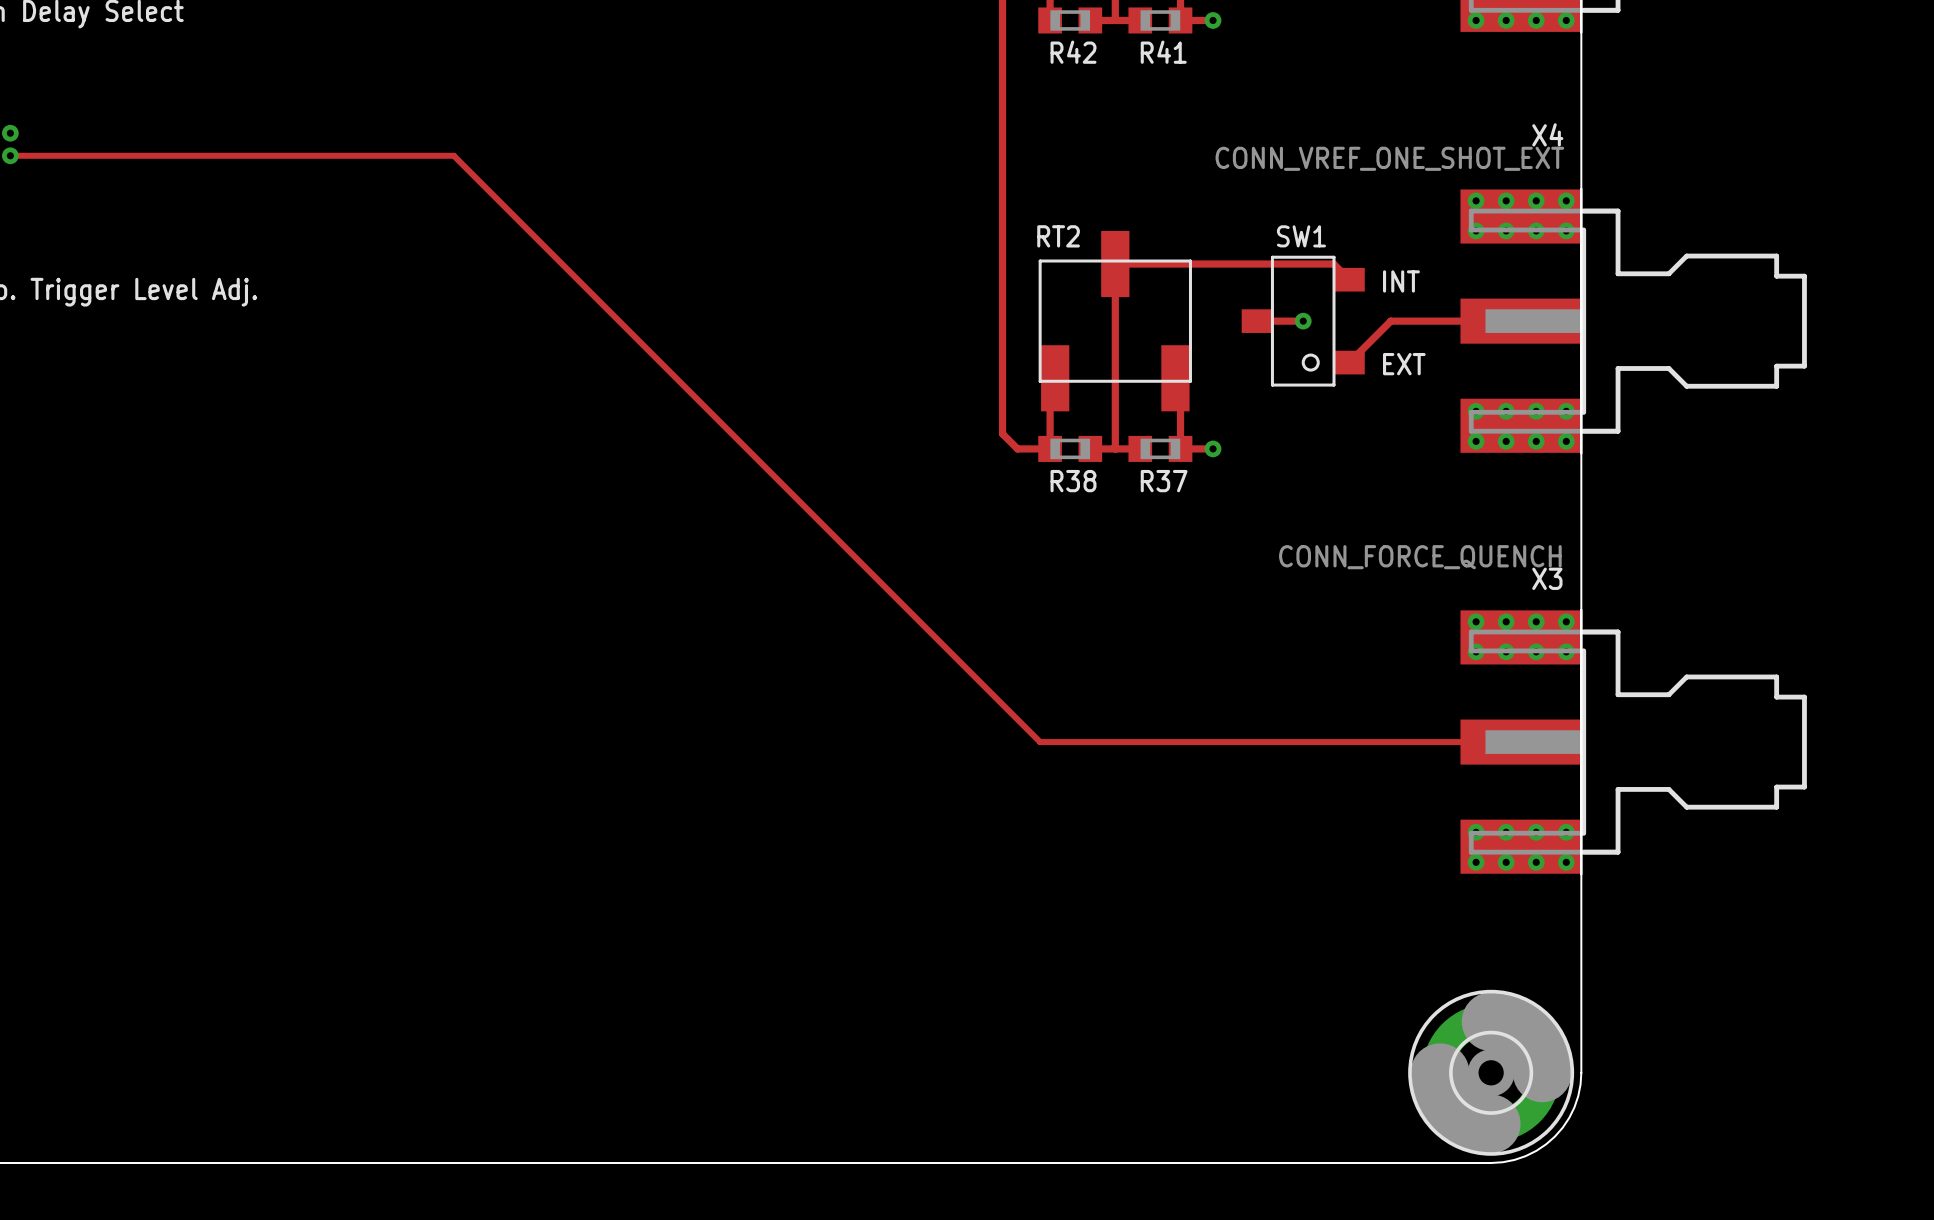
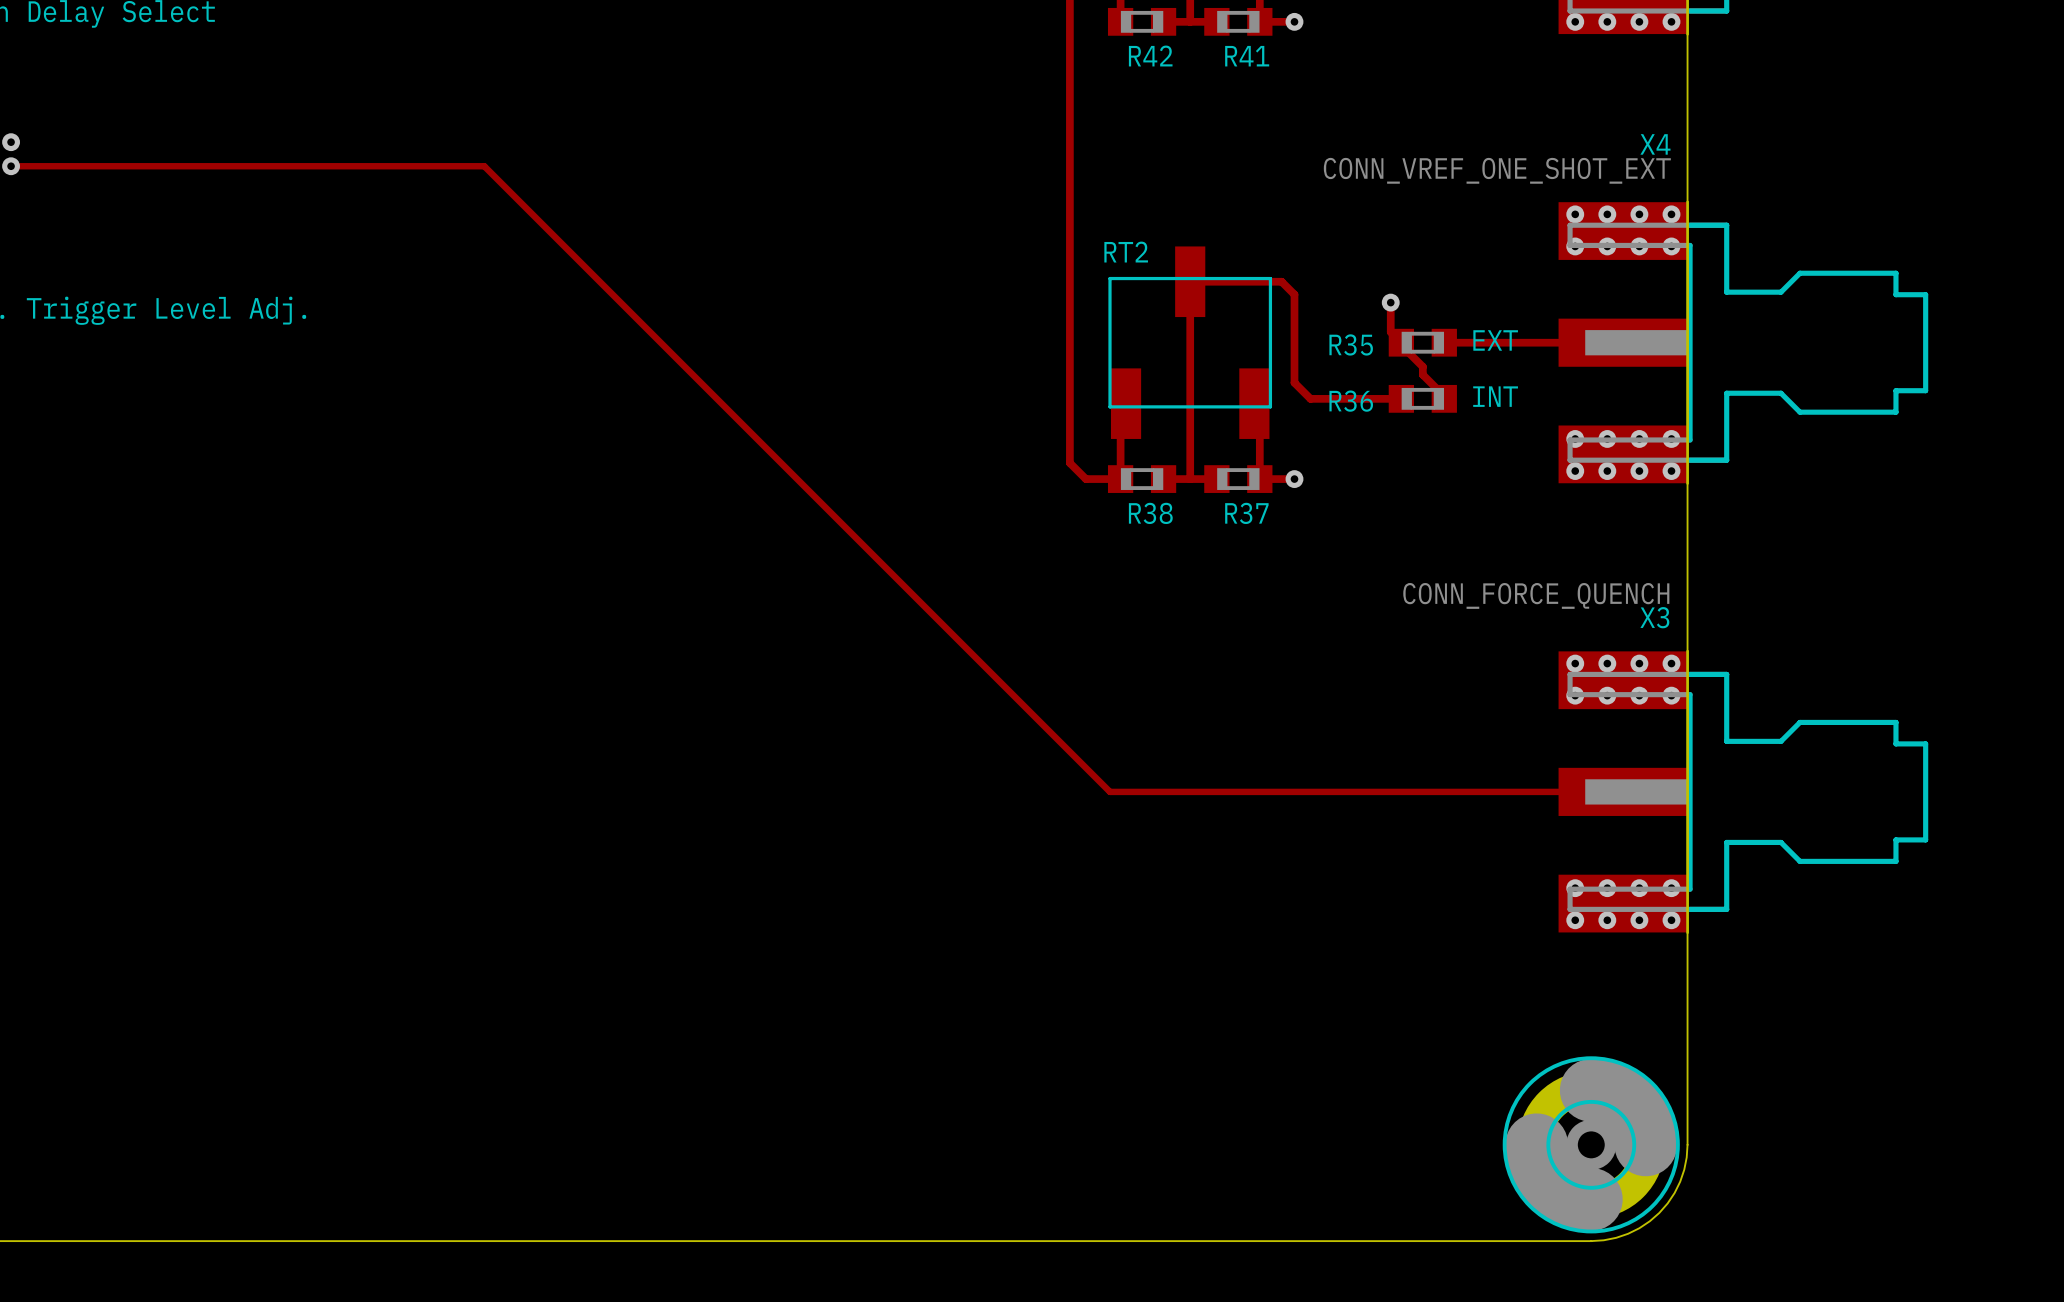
track: (1201, 264) (1333, 264) (1349, 279) -> (1281, 281) (1294, 294) (1294, 382) (1310, 398) (1401, 398)
text: INT (1401, 281) -> none
track: none -> (1390, 302) (1390, 332) (1422, 366) (1422, 374) (1444, 396) (1444, 398)
text: none -> EXT (1495, 340)
track: (1257, 321) (1303, 321) -> none
SW1: (1303, 321) -> none
via position: (1303, 321) -> (1390, 302)
R35: none -> (1422, 342)
track: (1390, 321) (1349, 362) -> (1484, 342) (1444, 342)
text: EXT (1404, 364) -> INT (1495, 396)
R36: none -> (1422, 398)

